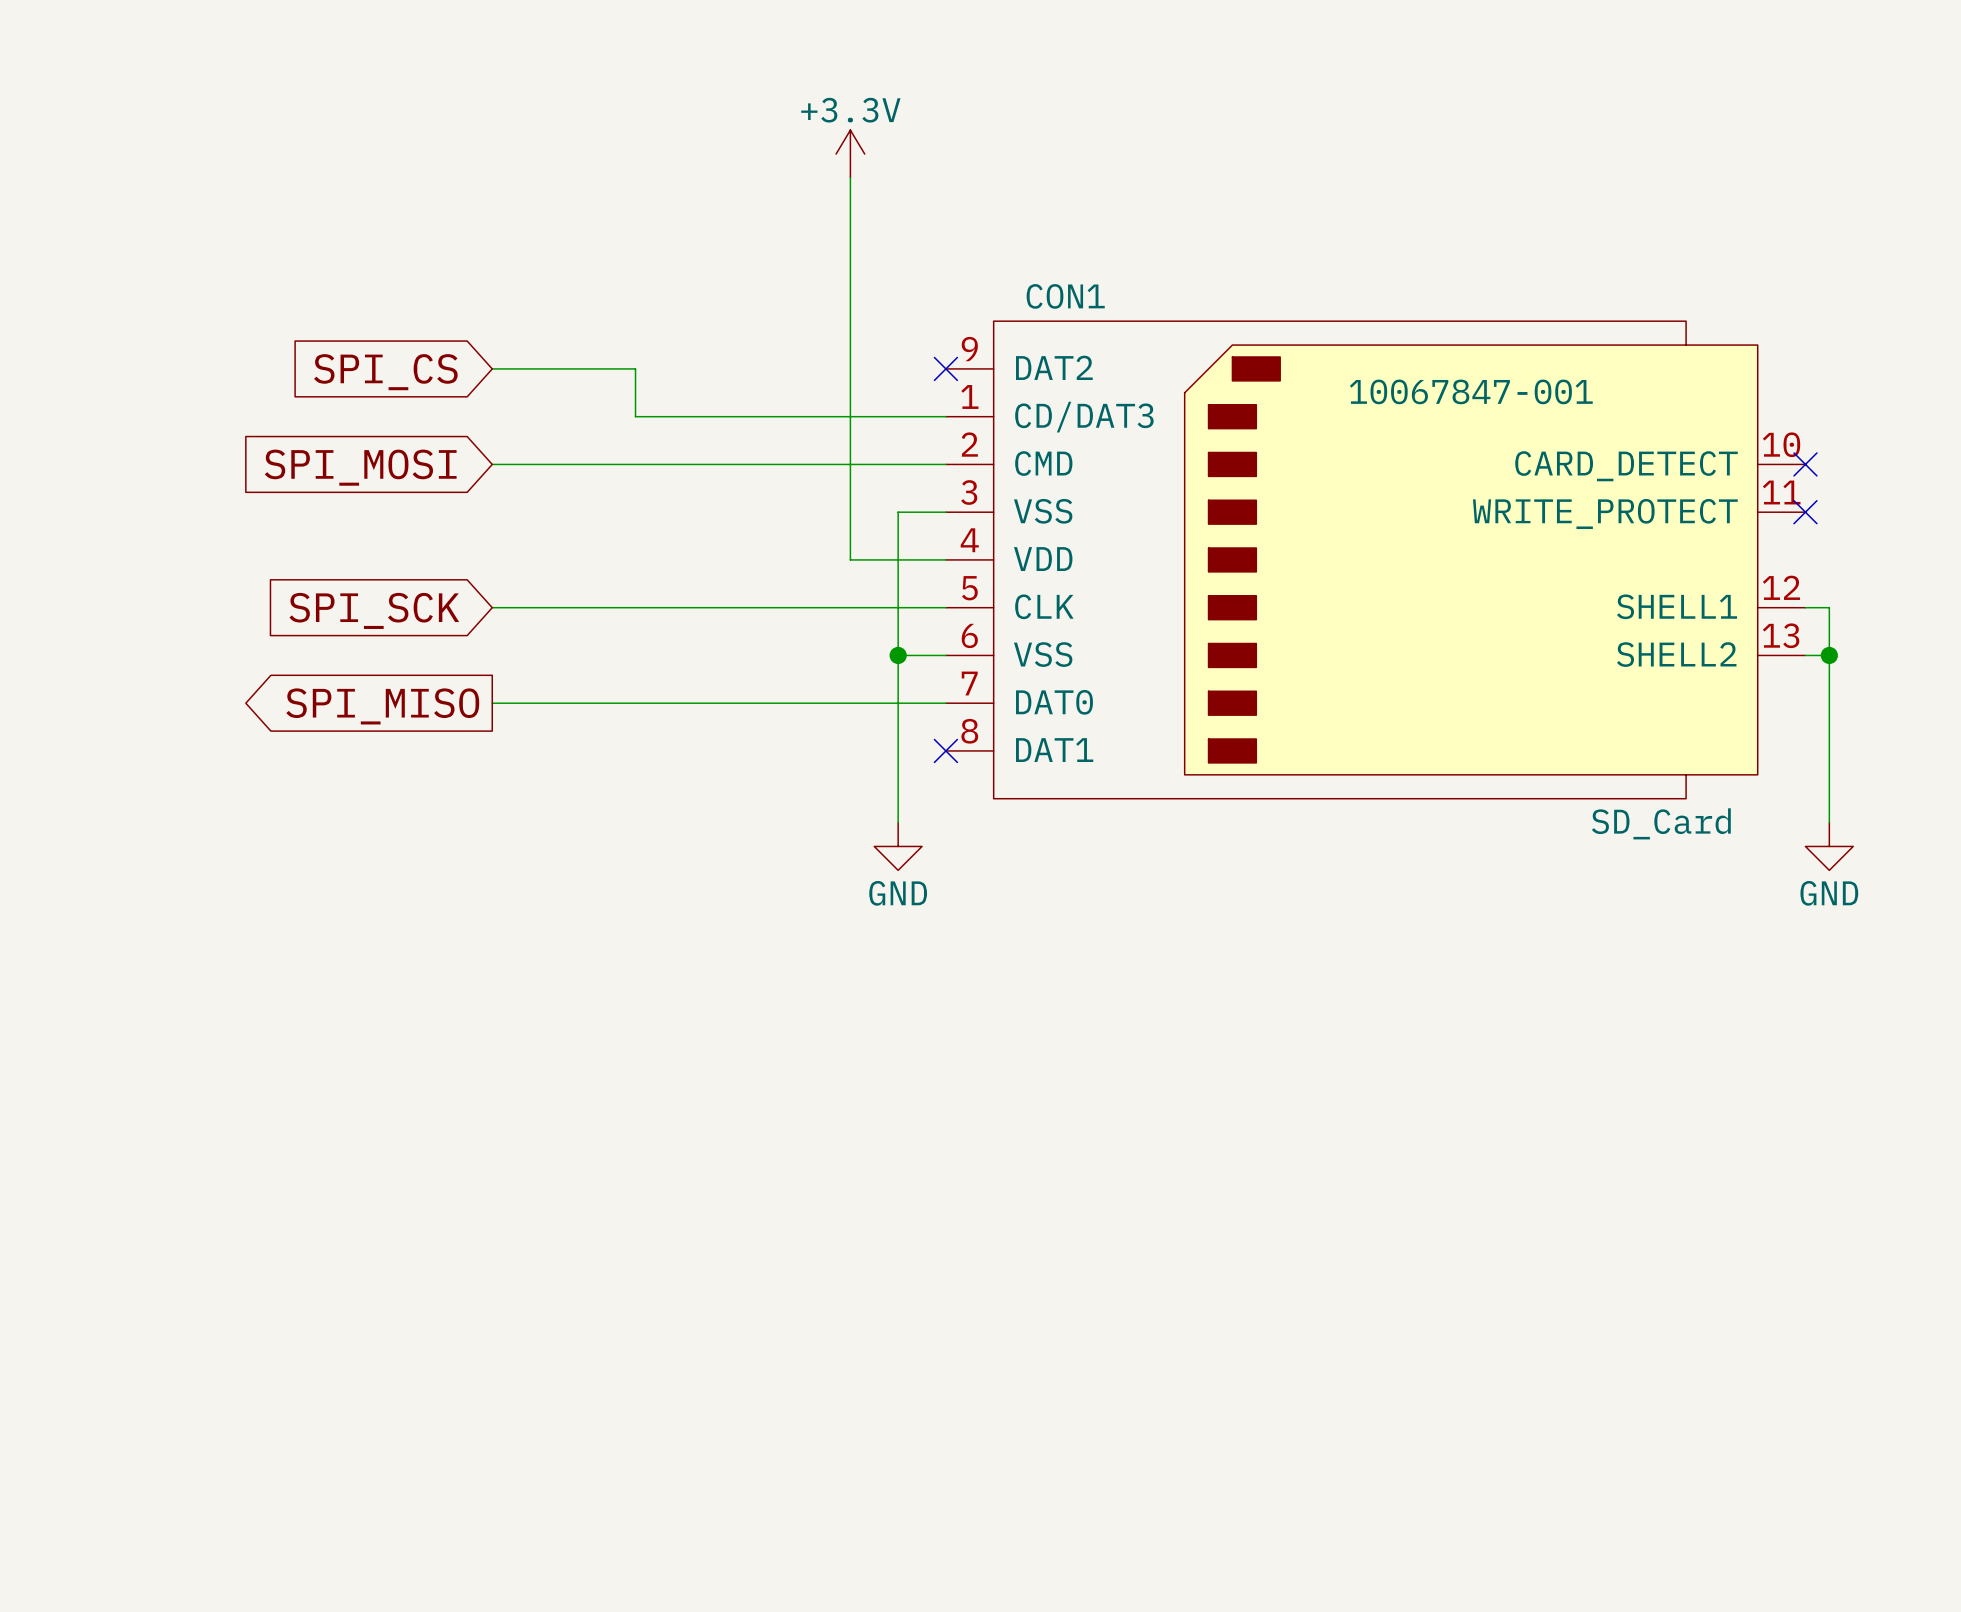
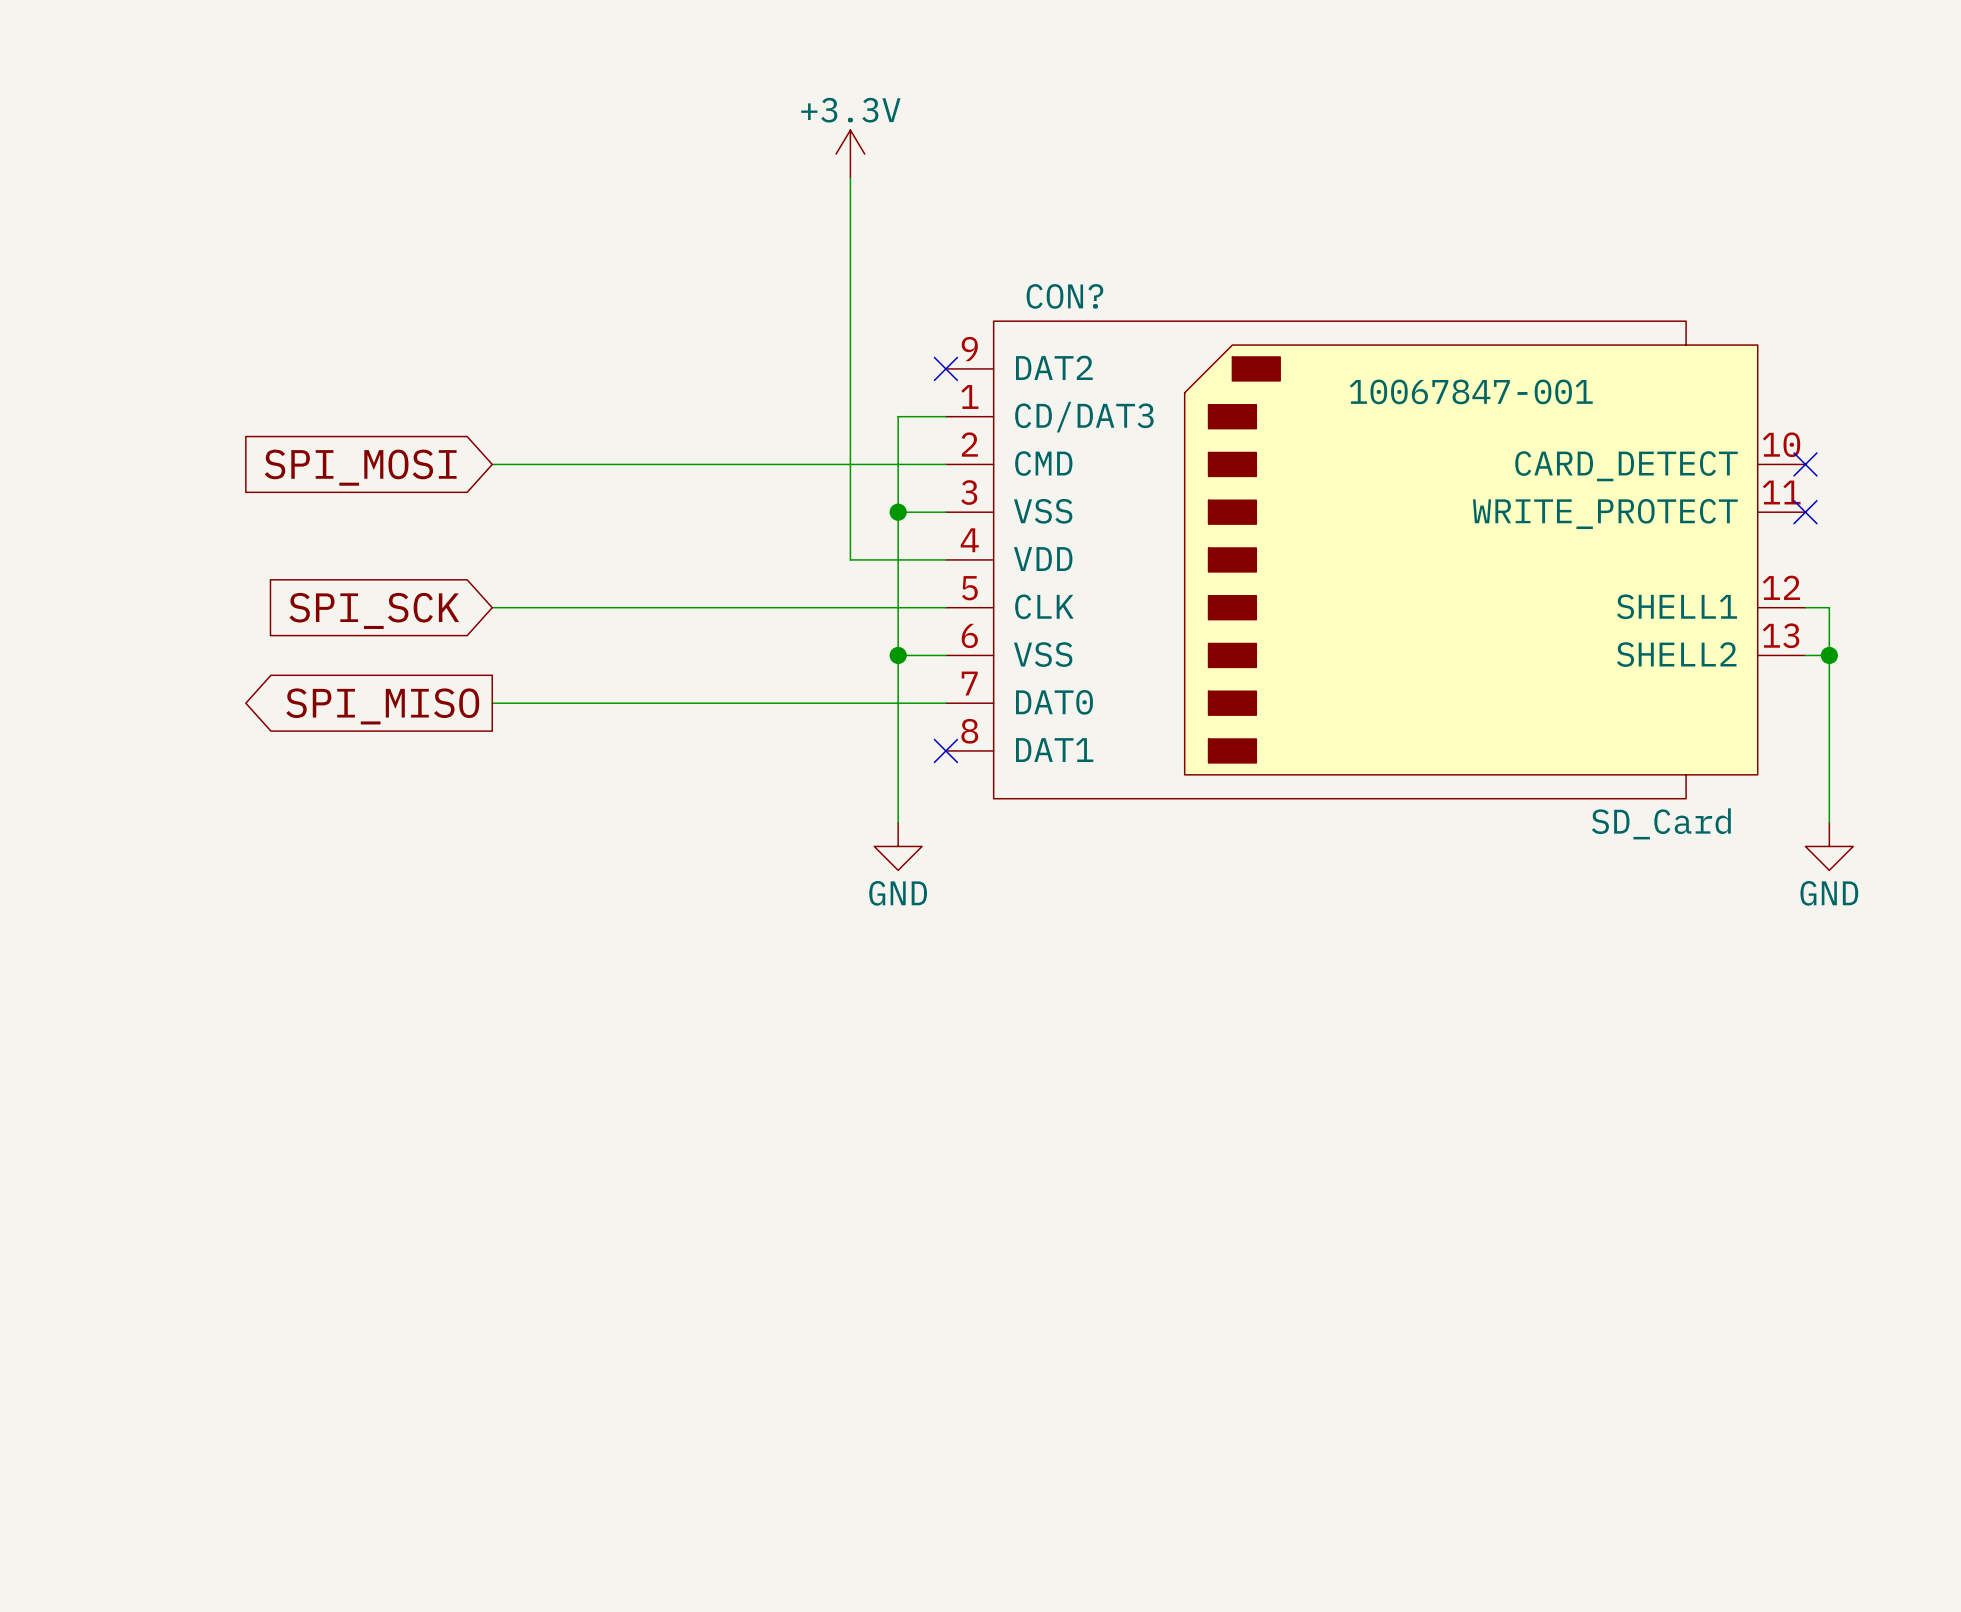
CON1 name: CON1 (1065, 296) -> CON? (1064, 296)
wire: (492, 368) (635, 368) (635, 416) (898, 416) -> (898, 512) (898, 416)
global label: SPI_CS (385, 372) -> none
junction: none -> (898, 512)

